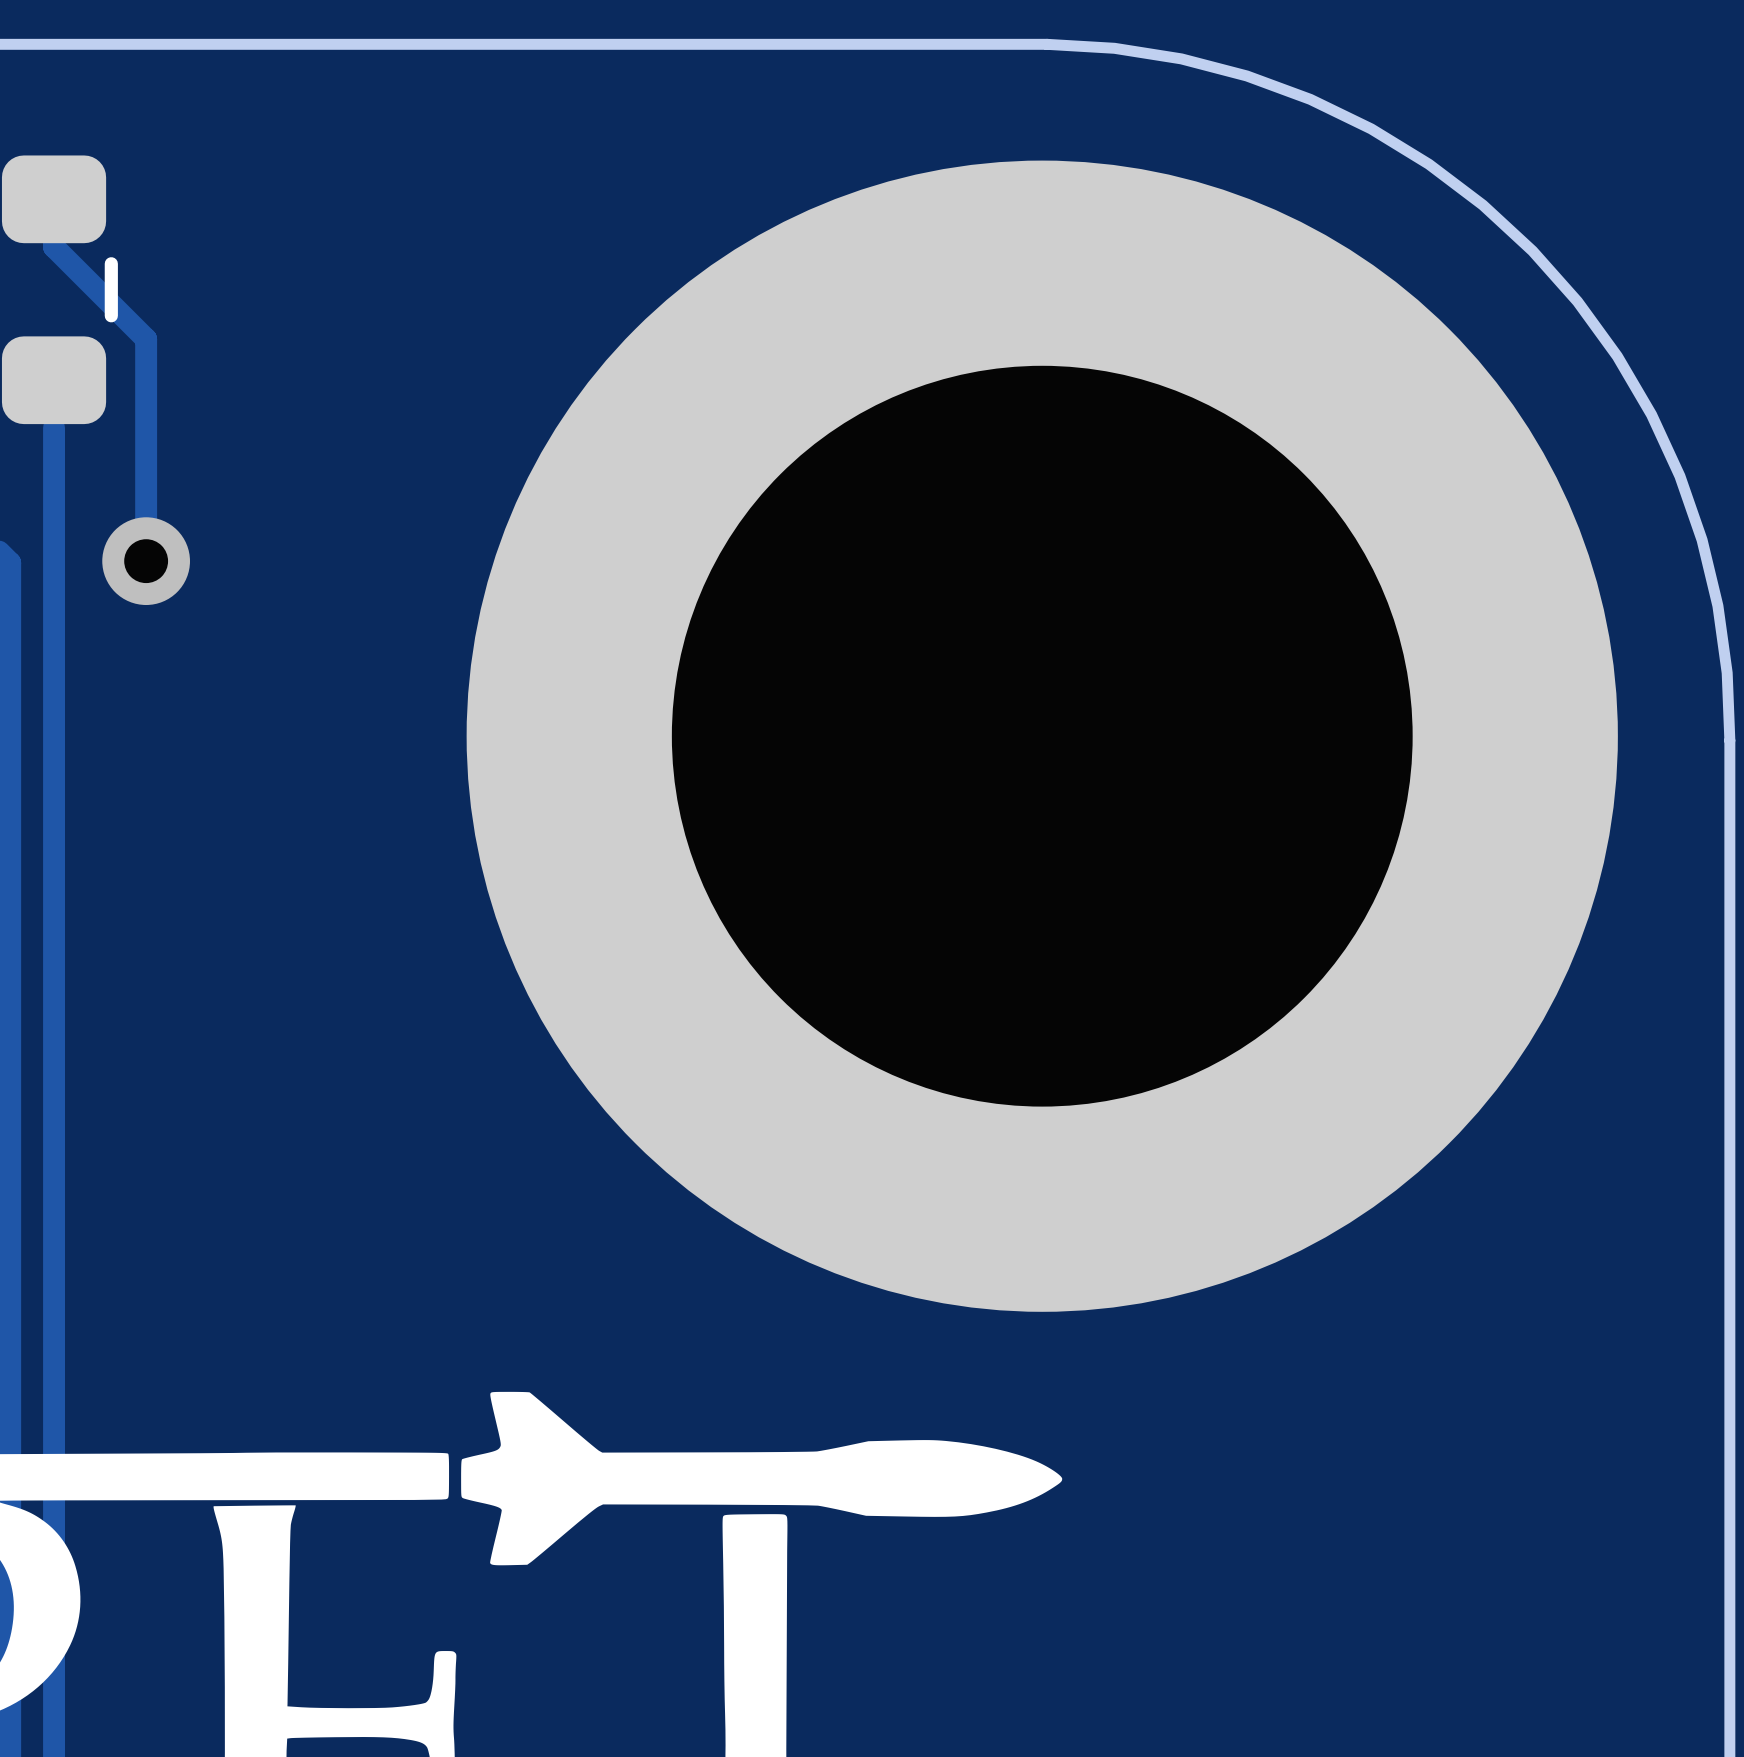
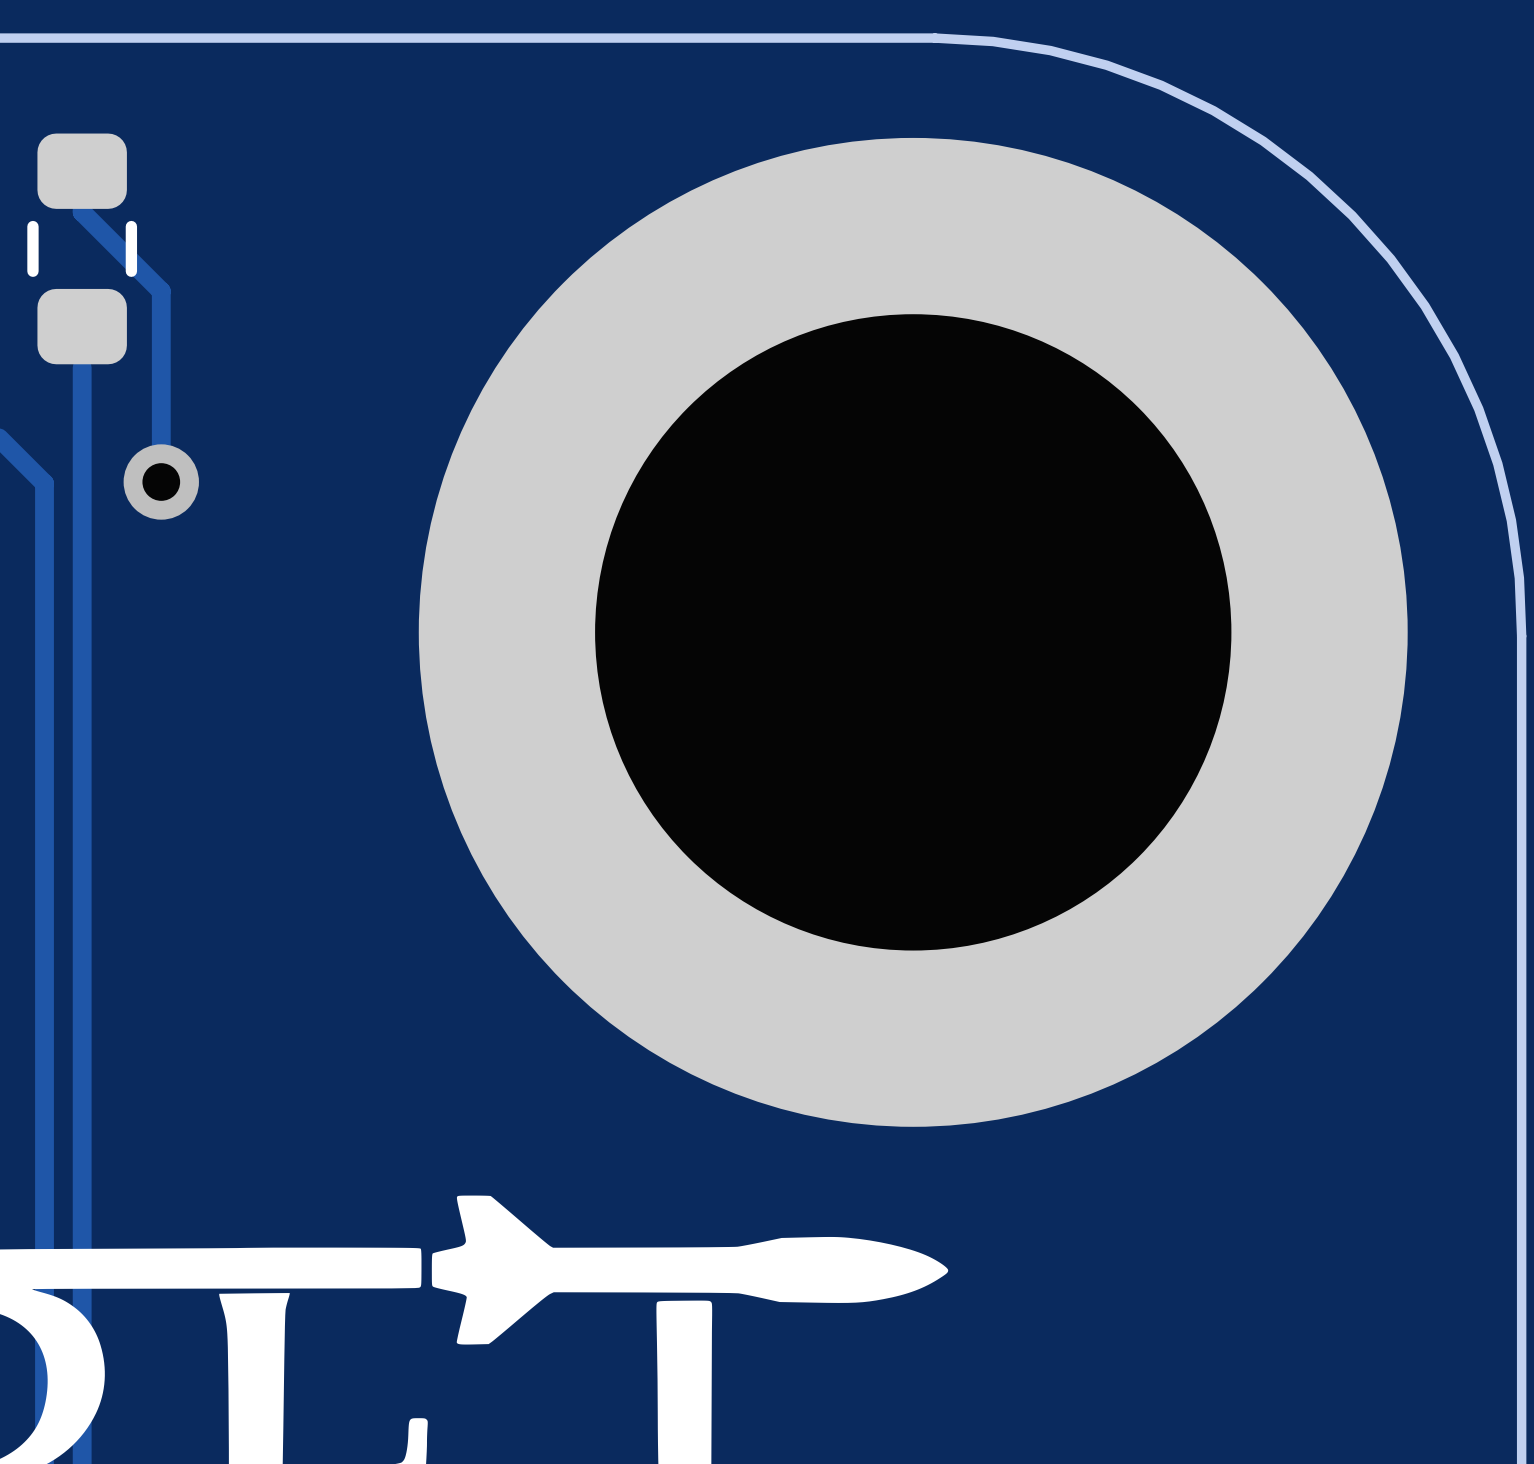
part position: (1042, 736) -> (913, 632)

